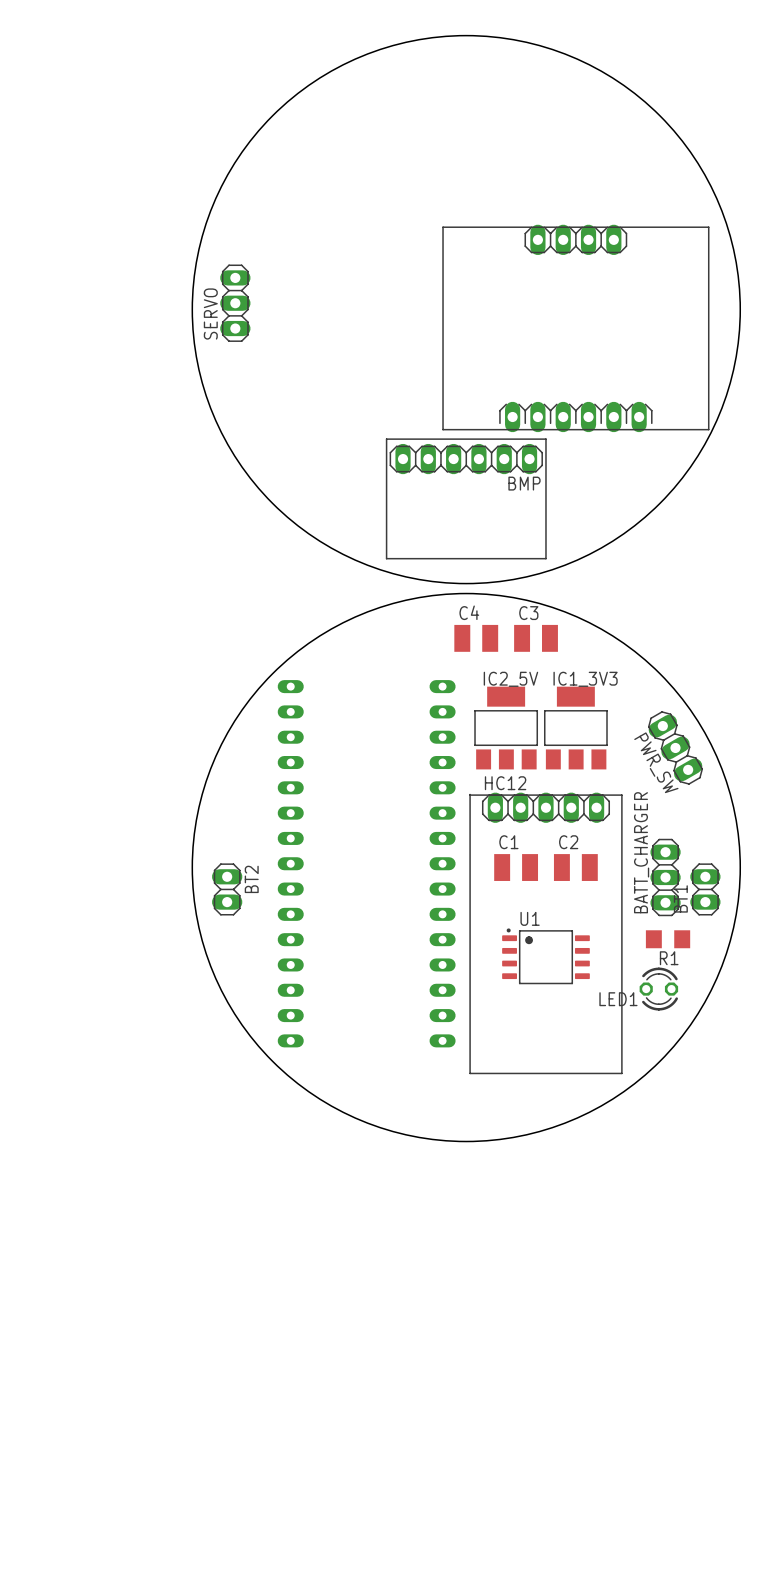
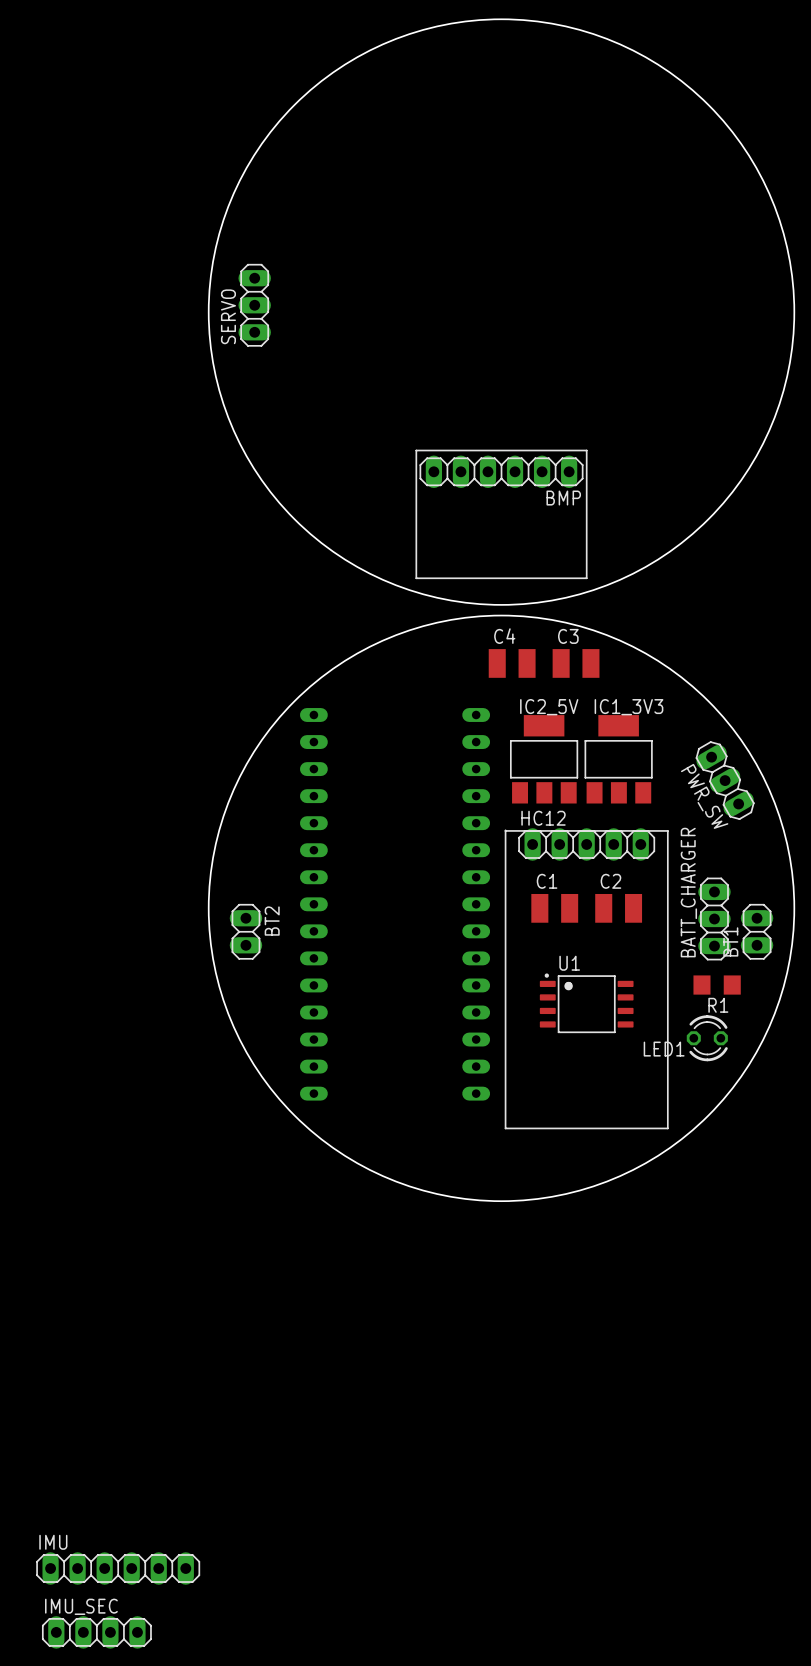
part: (575, 328) -> none
IMU: none -> (118, 1568)
IMU_SEC: none -> (96, 1632)

